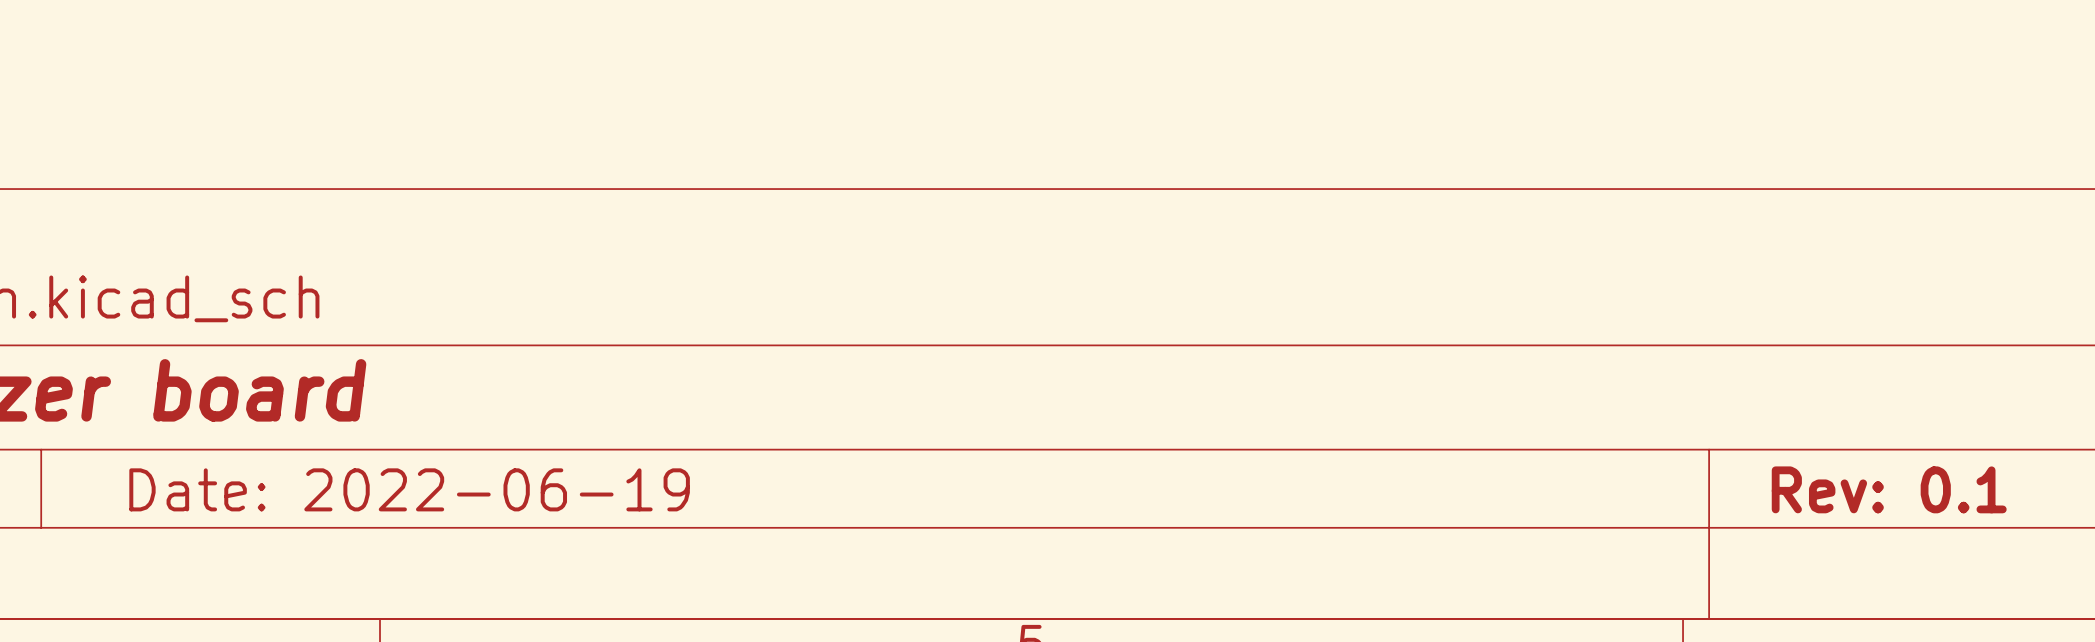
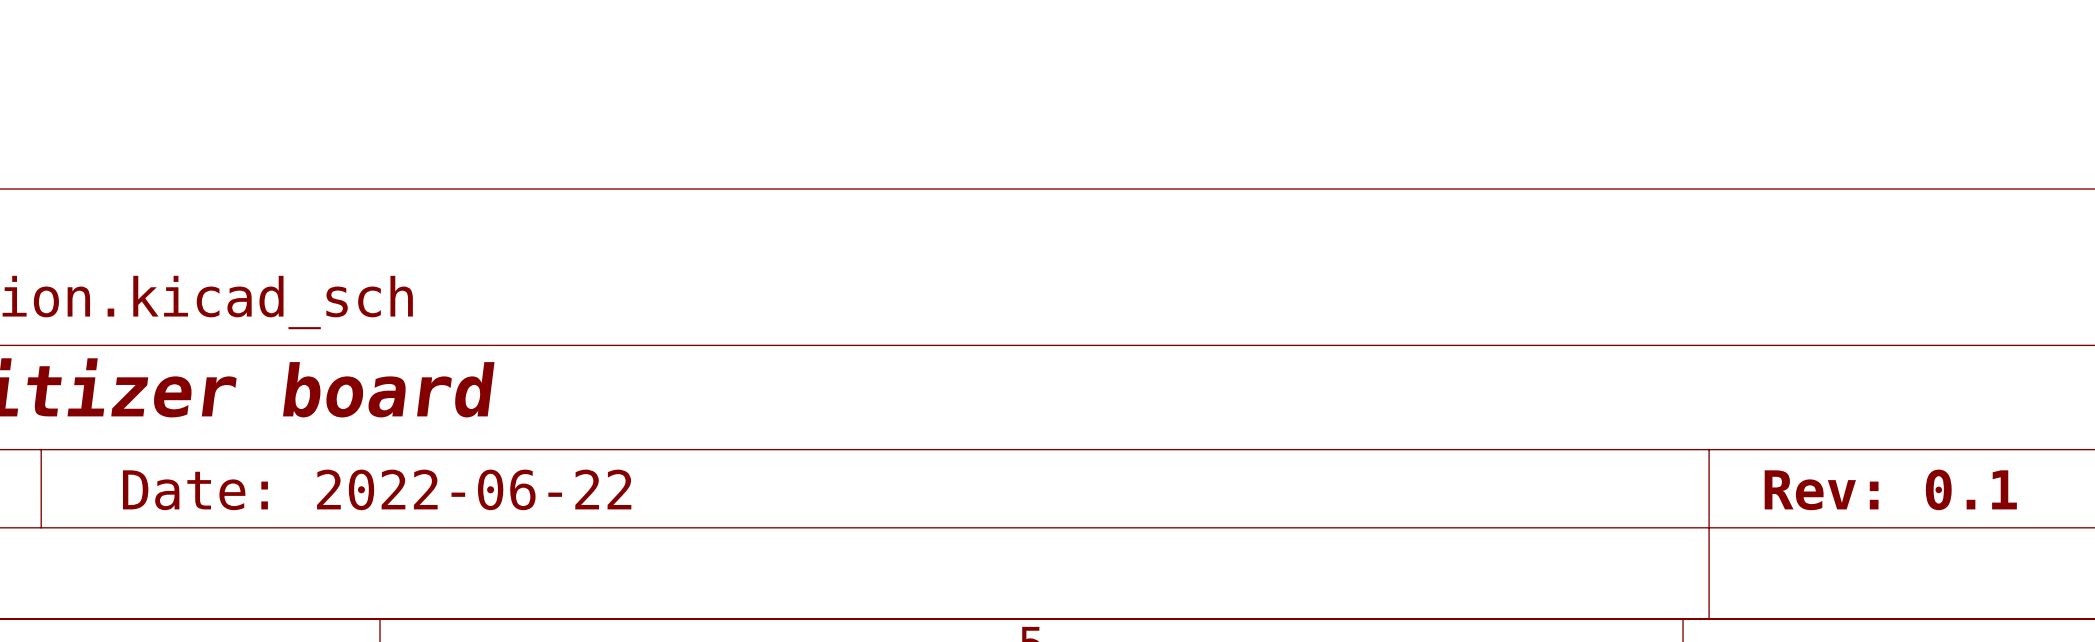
title block: Date: 2022-06-19 (409, 489) -> Date: 2022-06-22 (377, 489)

